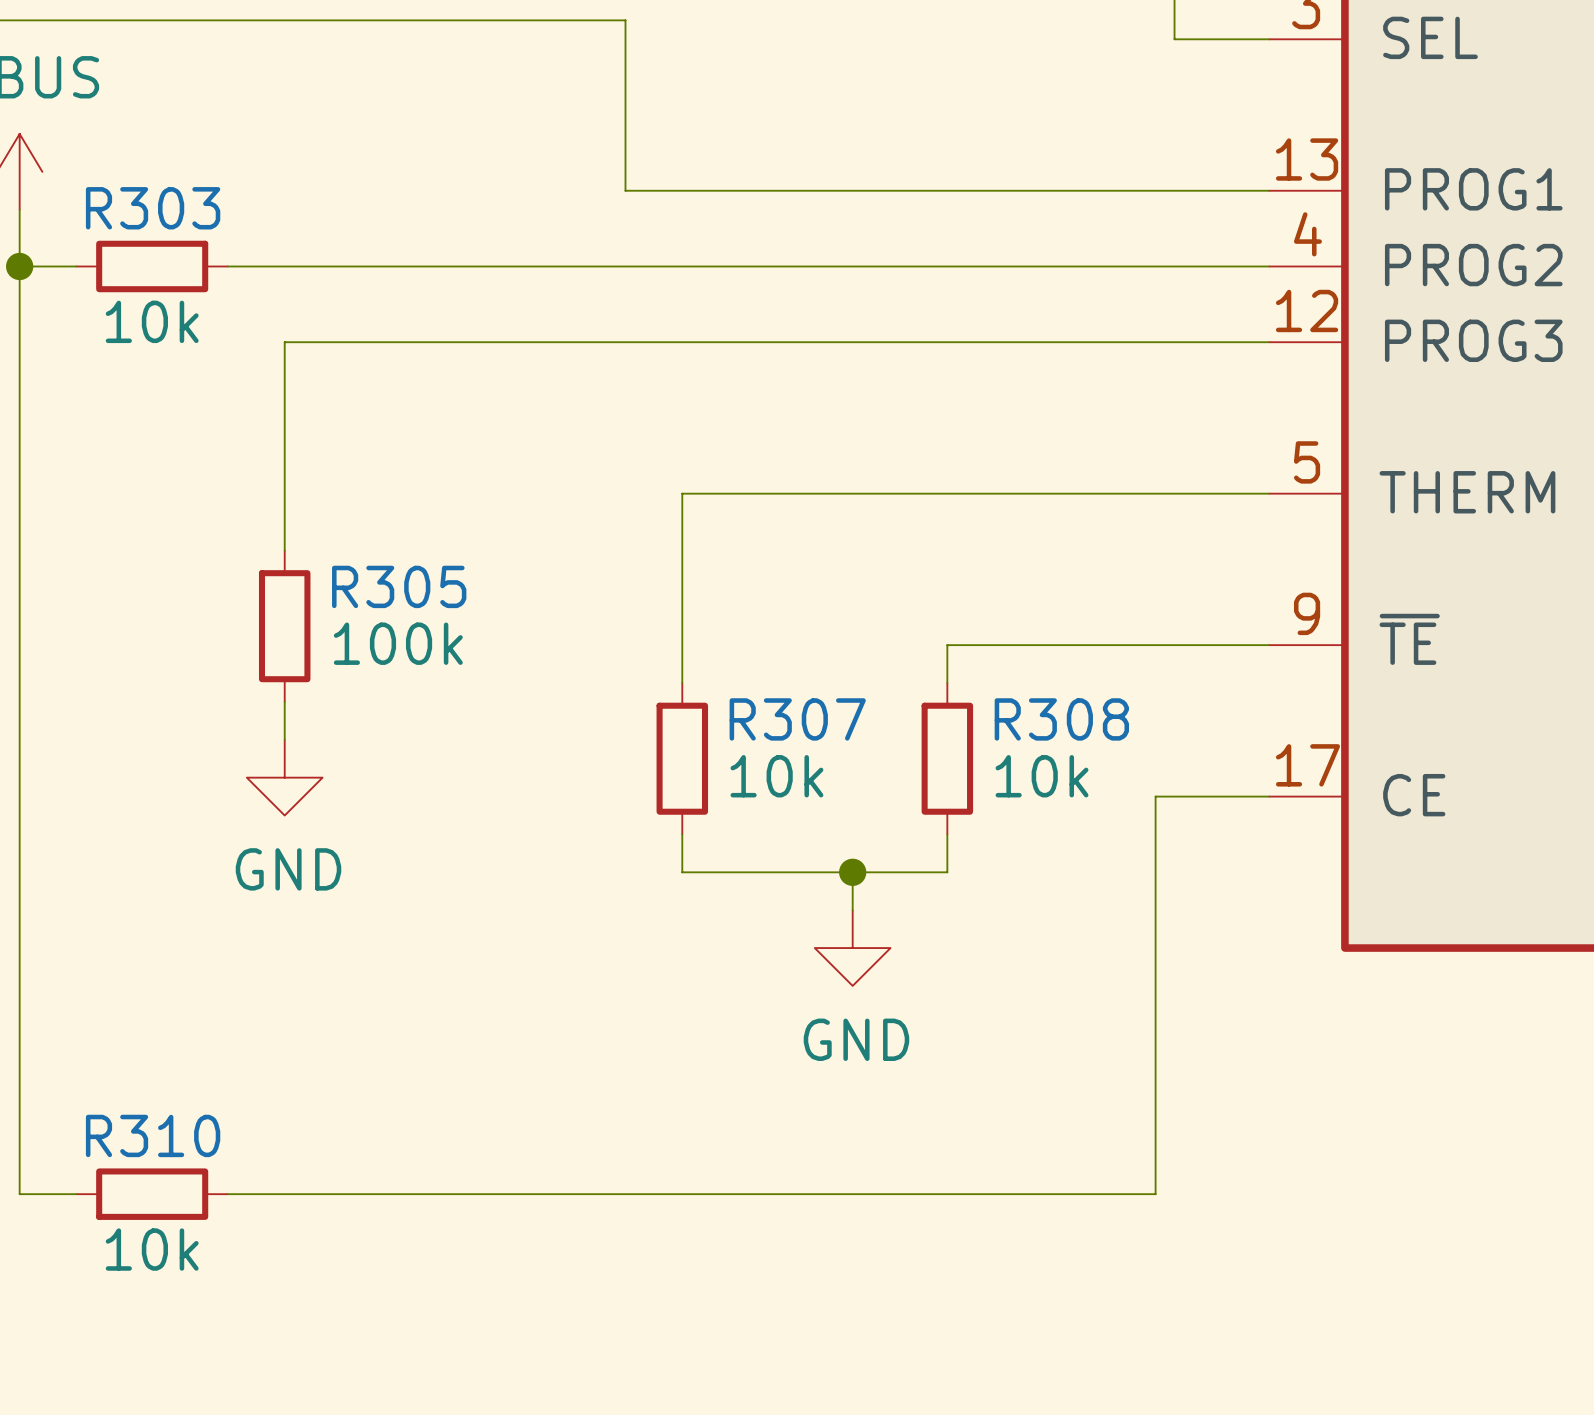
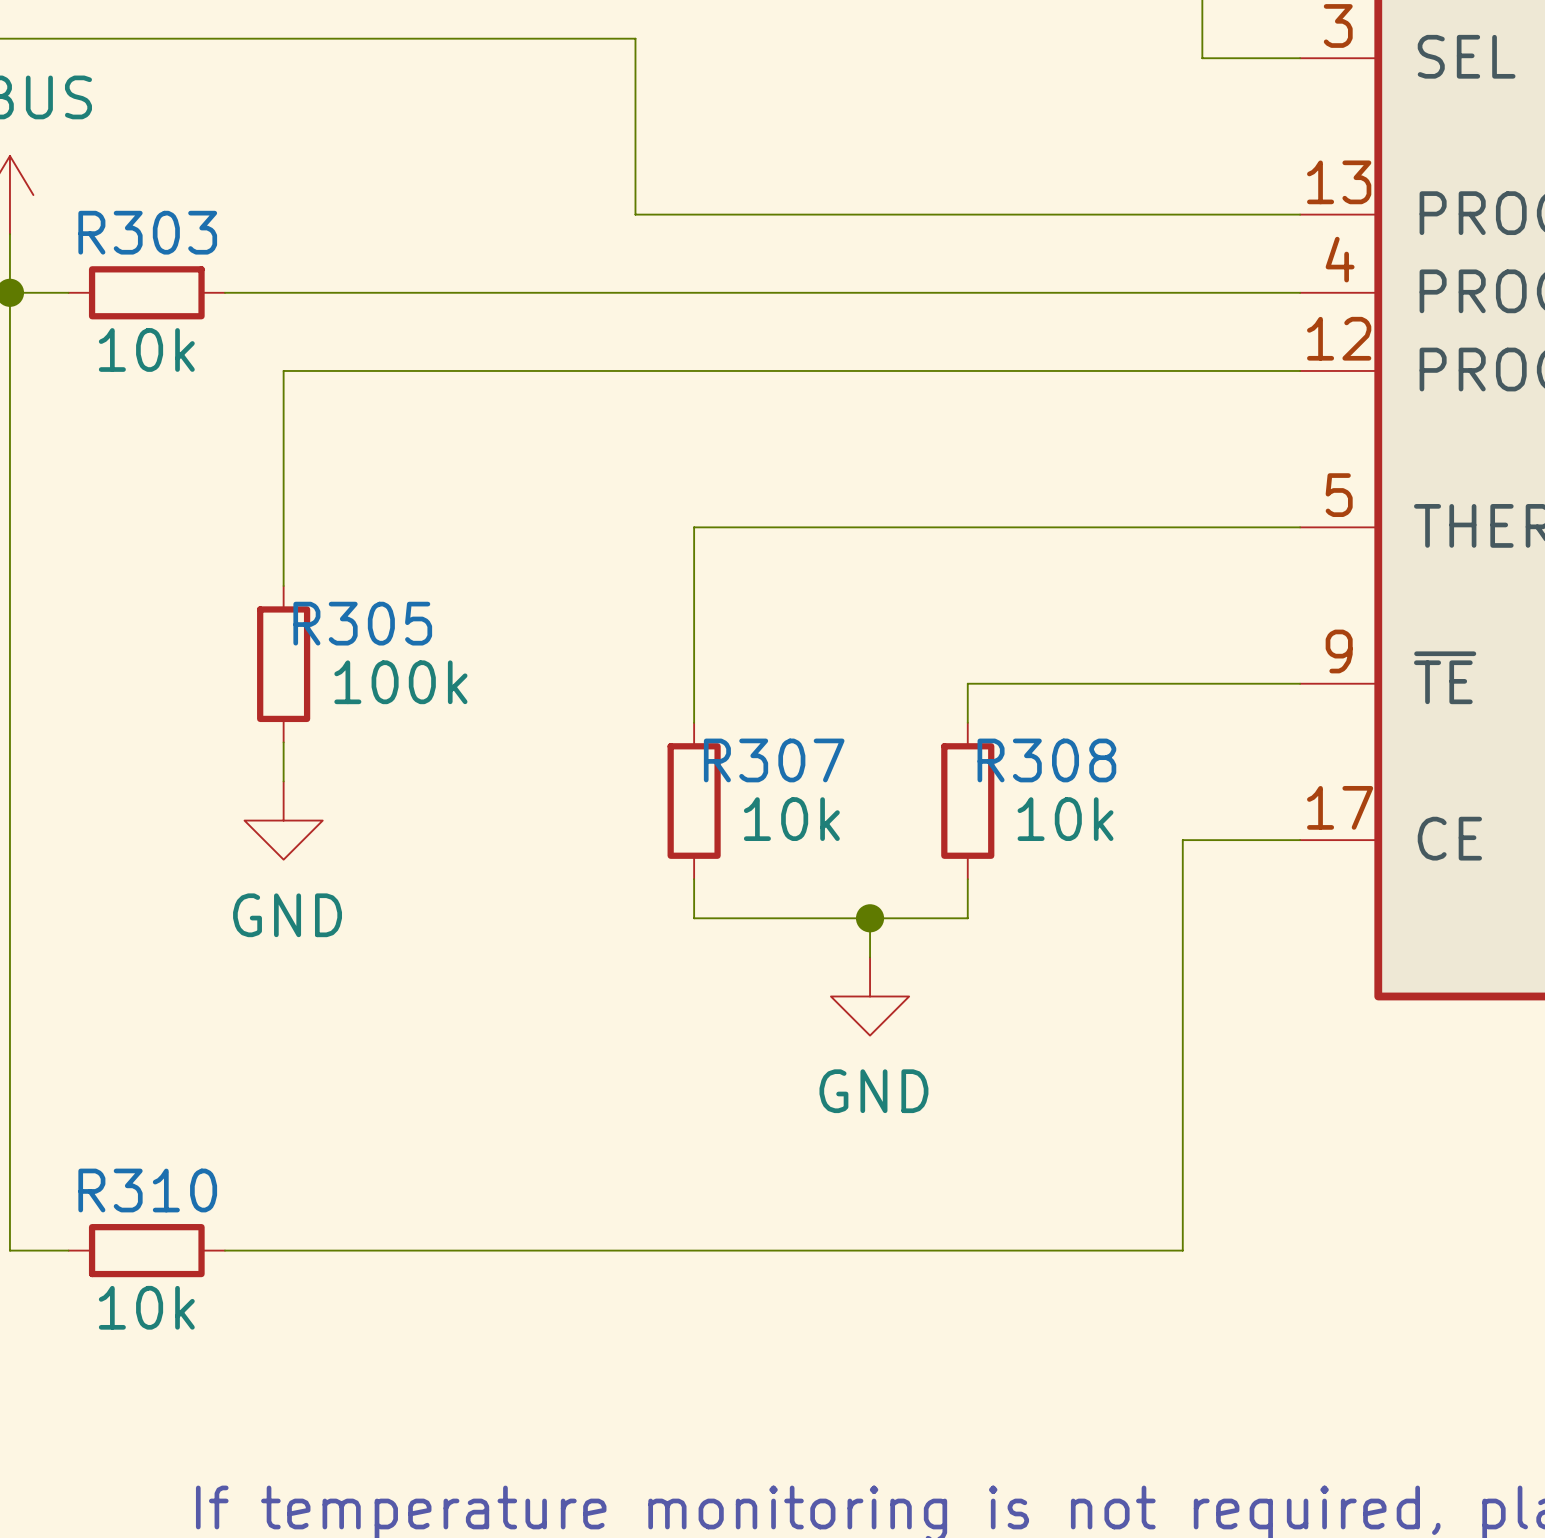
R305 name position: R305 (399, 586) -> R305 (362, 623)
R307 name position: R307 (797, 719) -> R307 (774, 760)
R308 name position: R308 (1061, 719) -> R308 (1046, 760)

